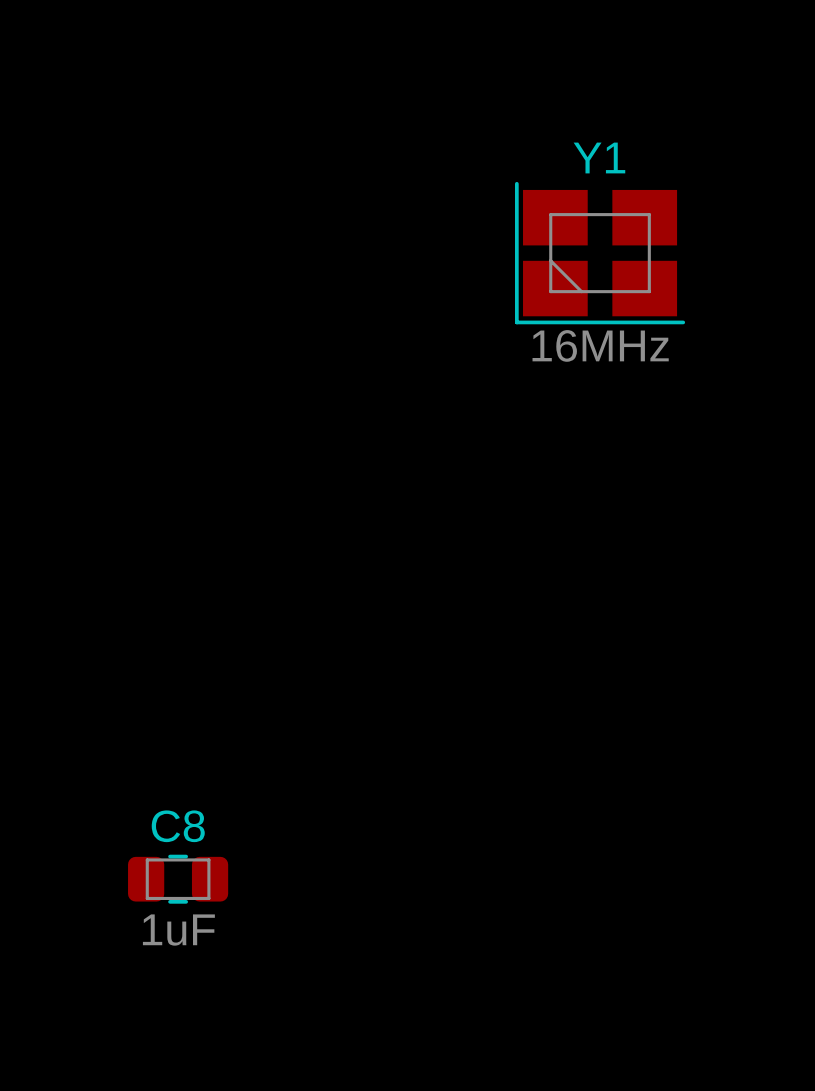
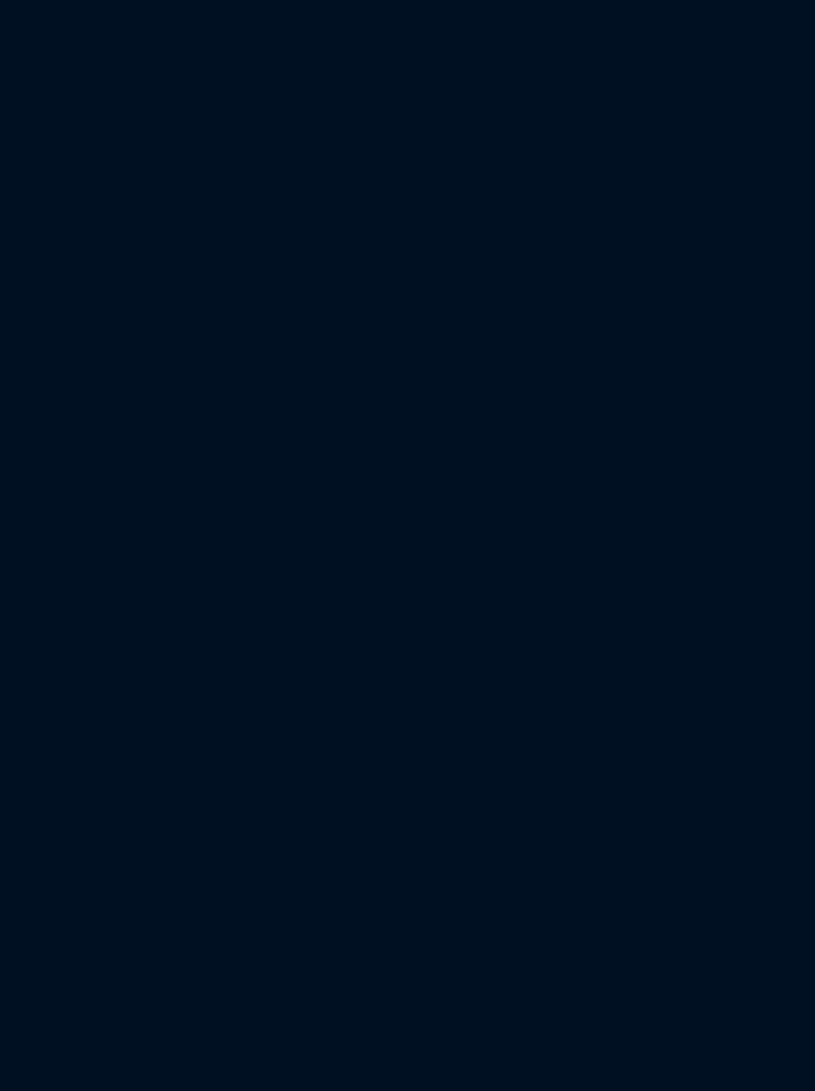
Y1: 16MHz (600, 253) -> none
C8: 1uF (178, 879) -> none

